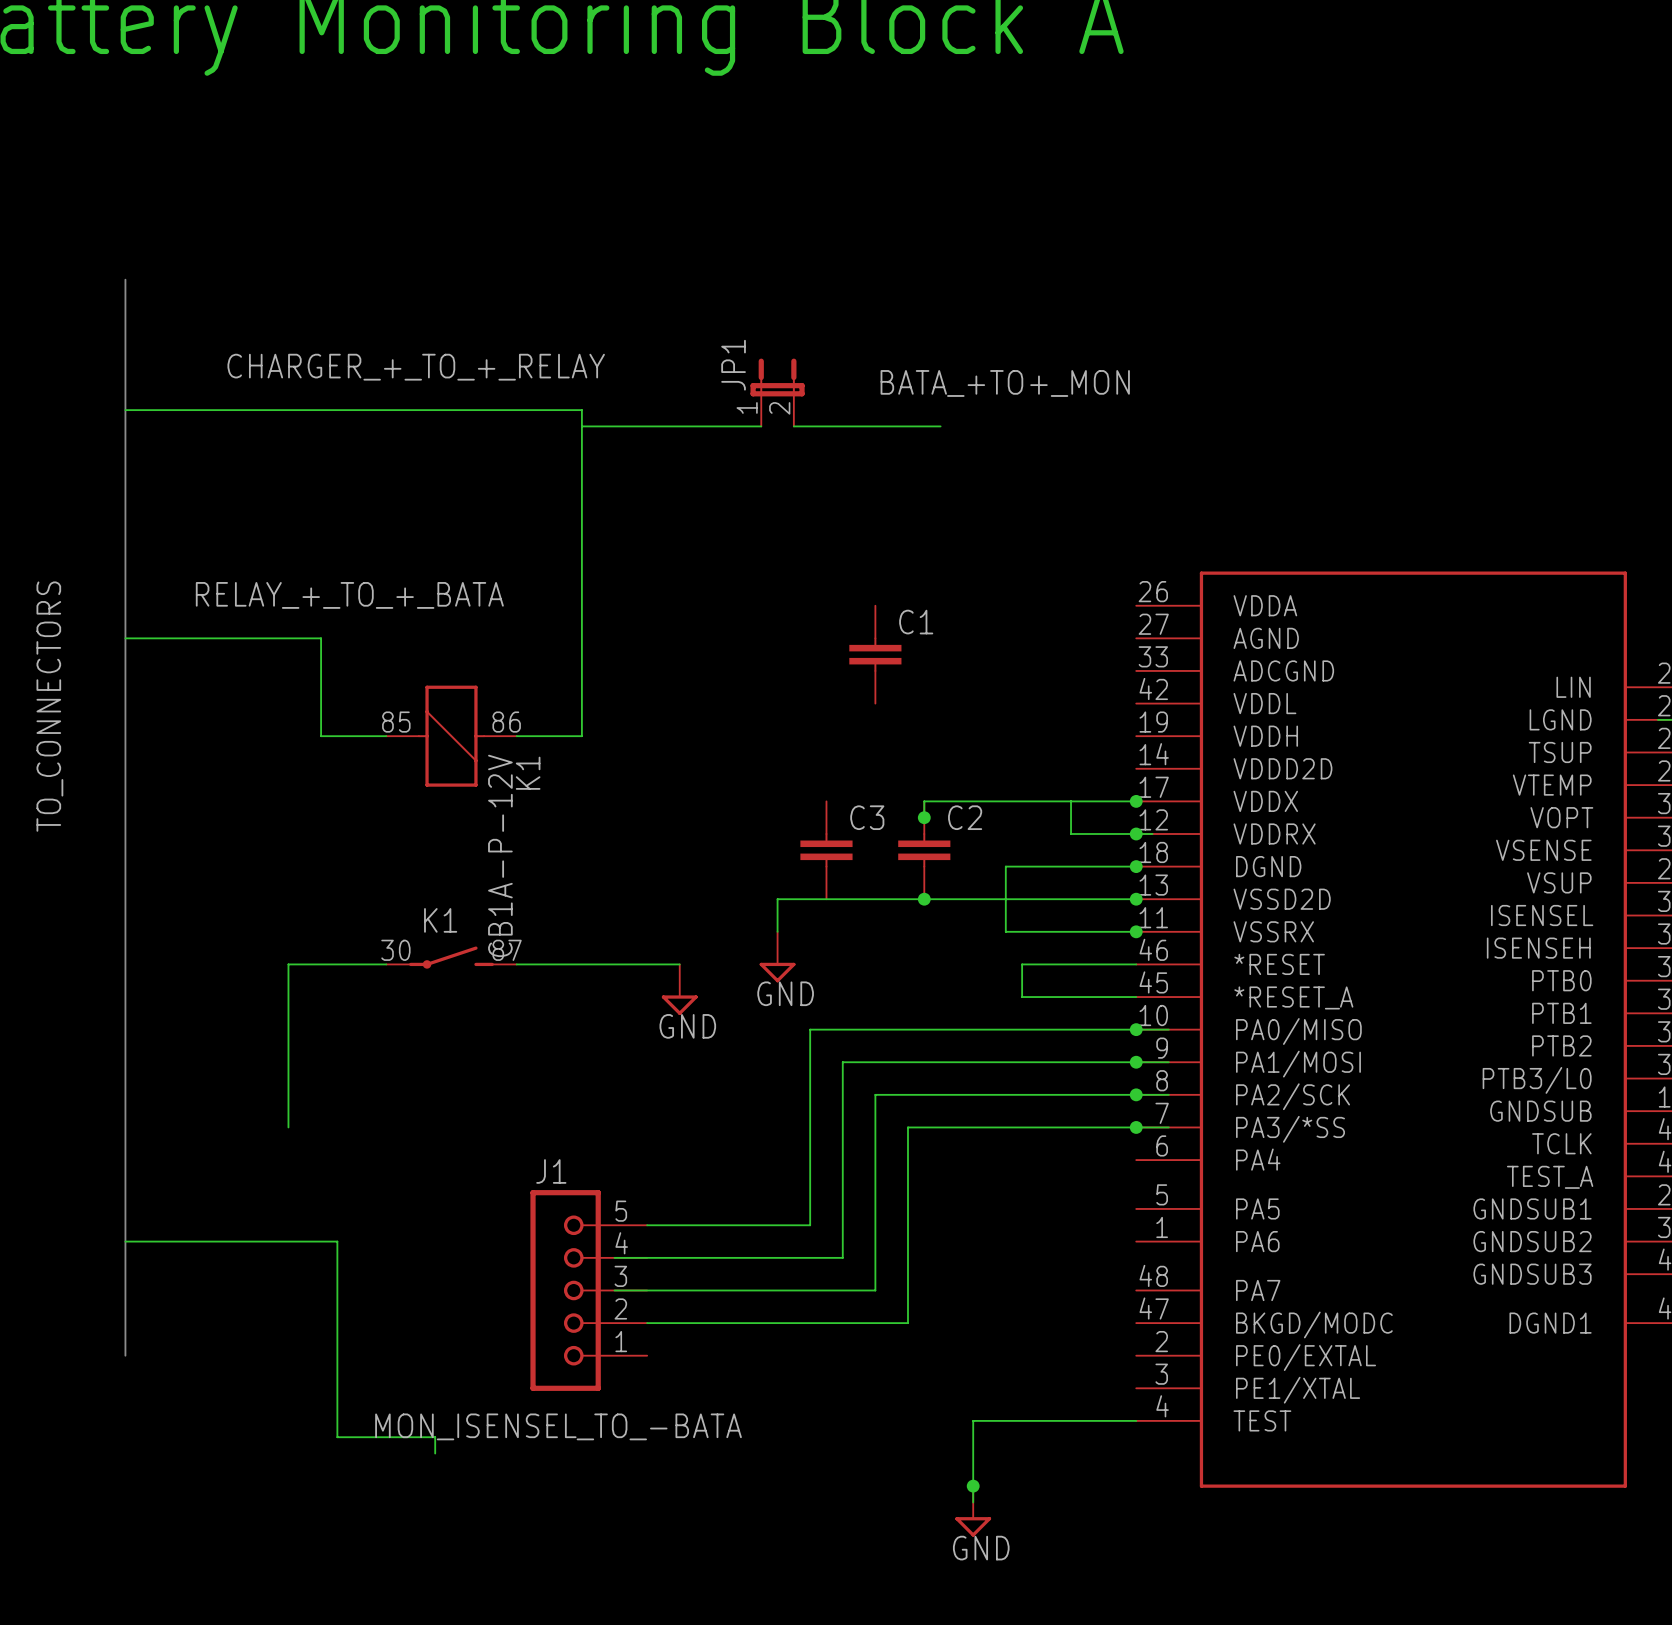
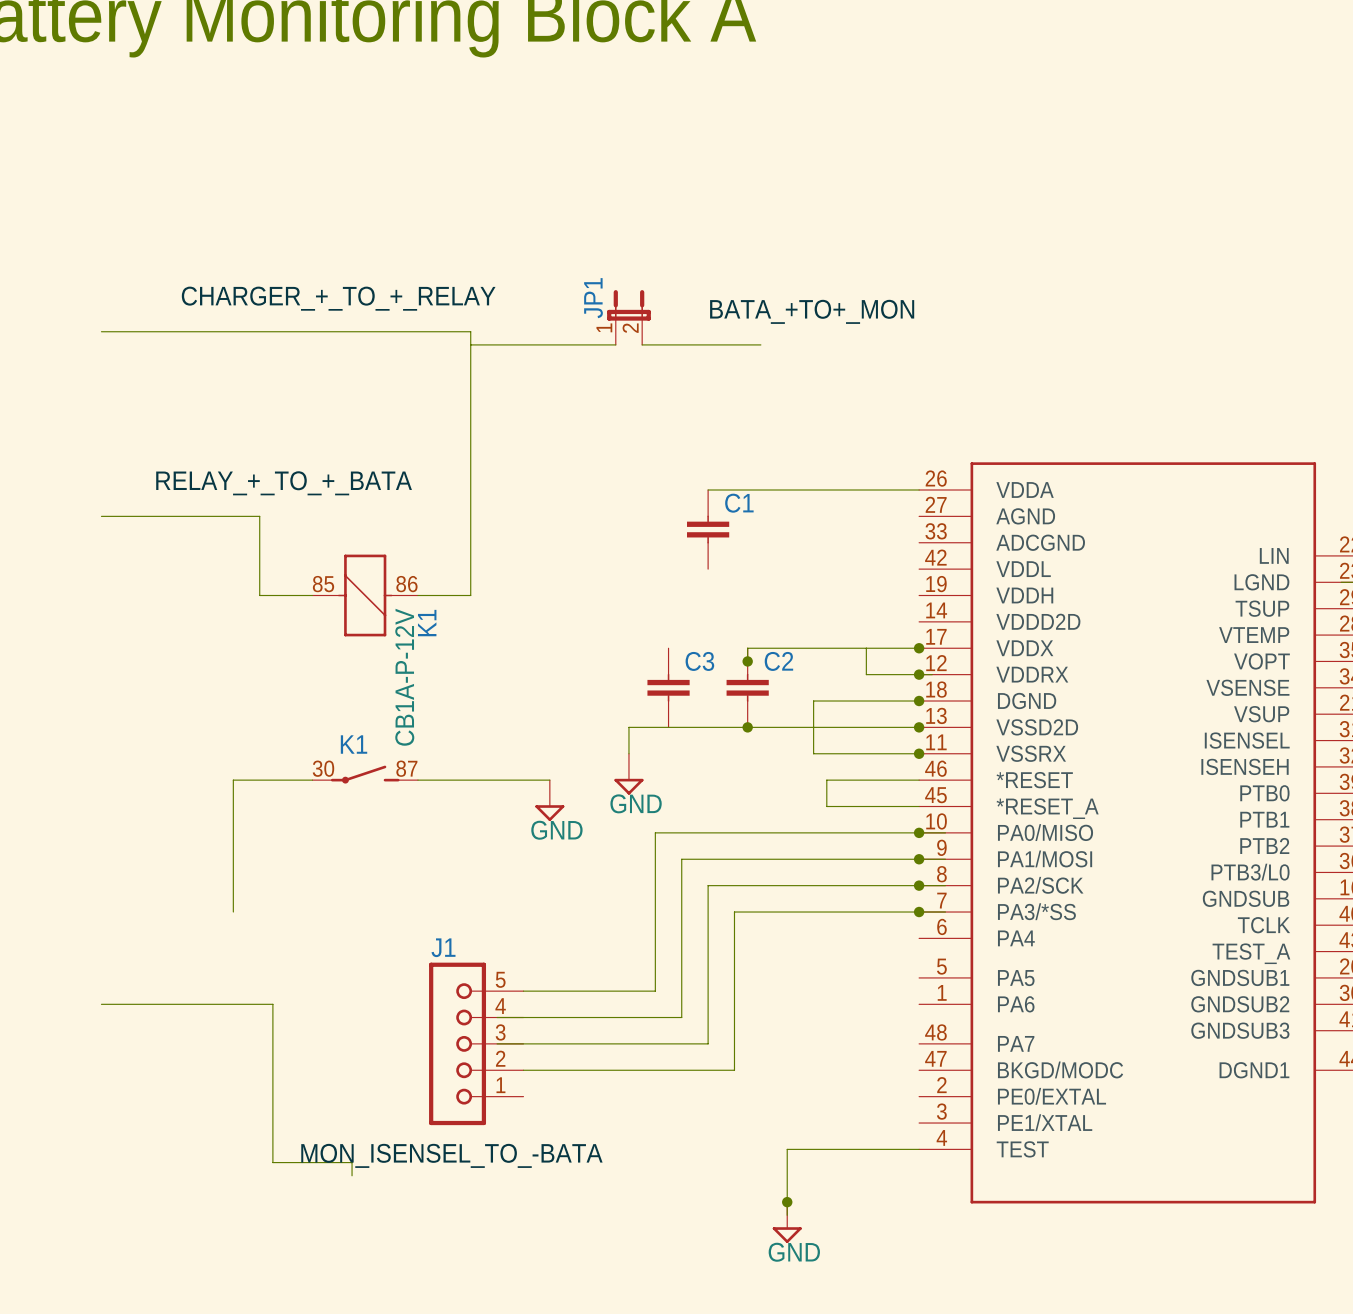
bus: (125, 279) (125, 1355) -> none
wire: none -> (708, 489) (919, 489)
label: TO_CONNECTORS (49, 706) -> none

